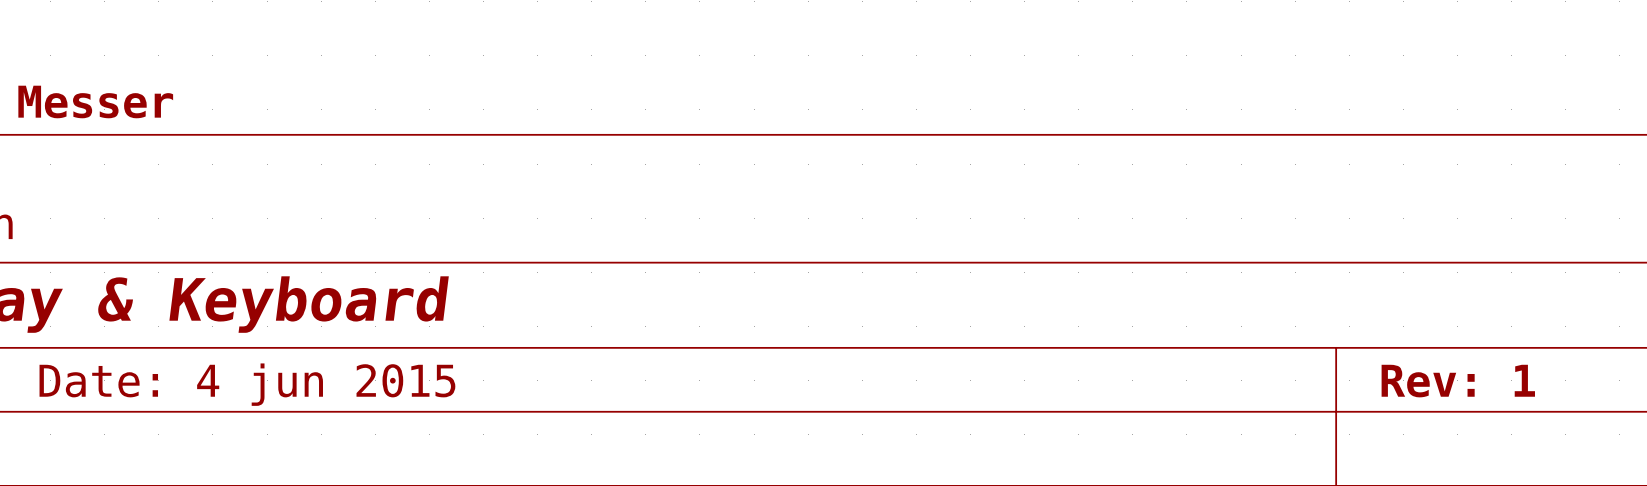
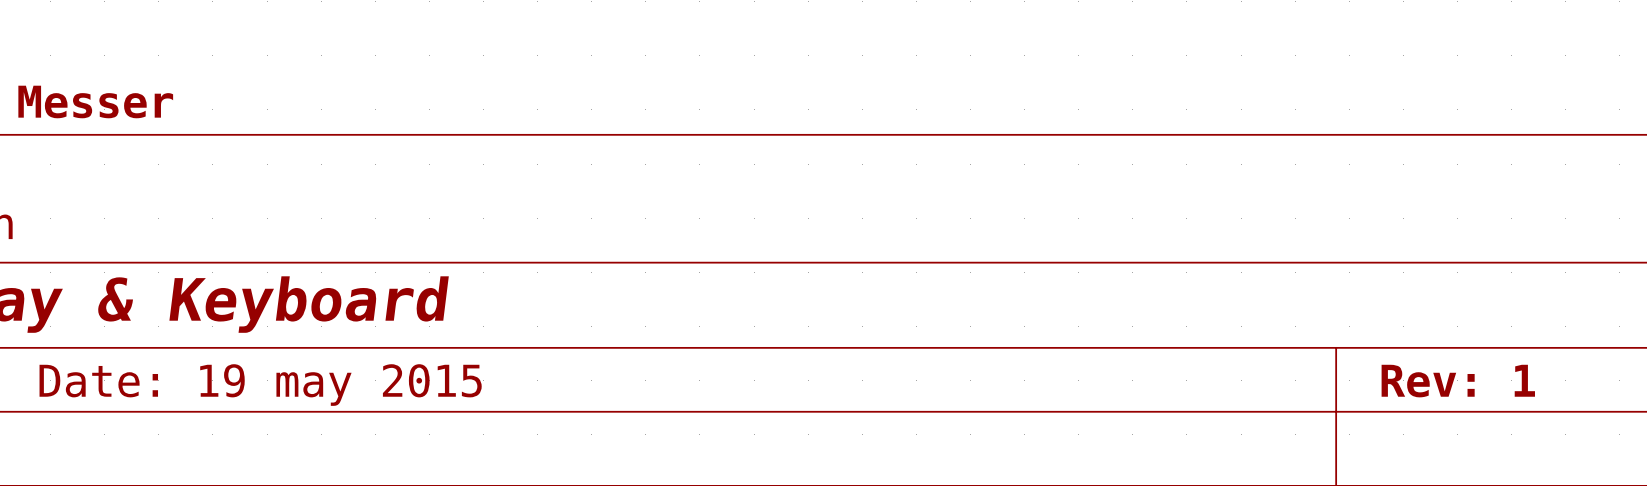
title block: Date: 4 jun 2015 (247, 384) -> Date: 19 may 2015 (260, 385)

